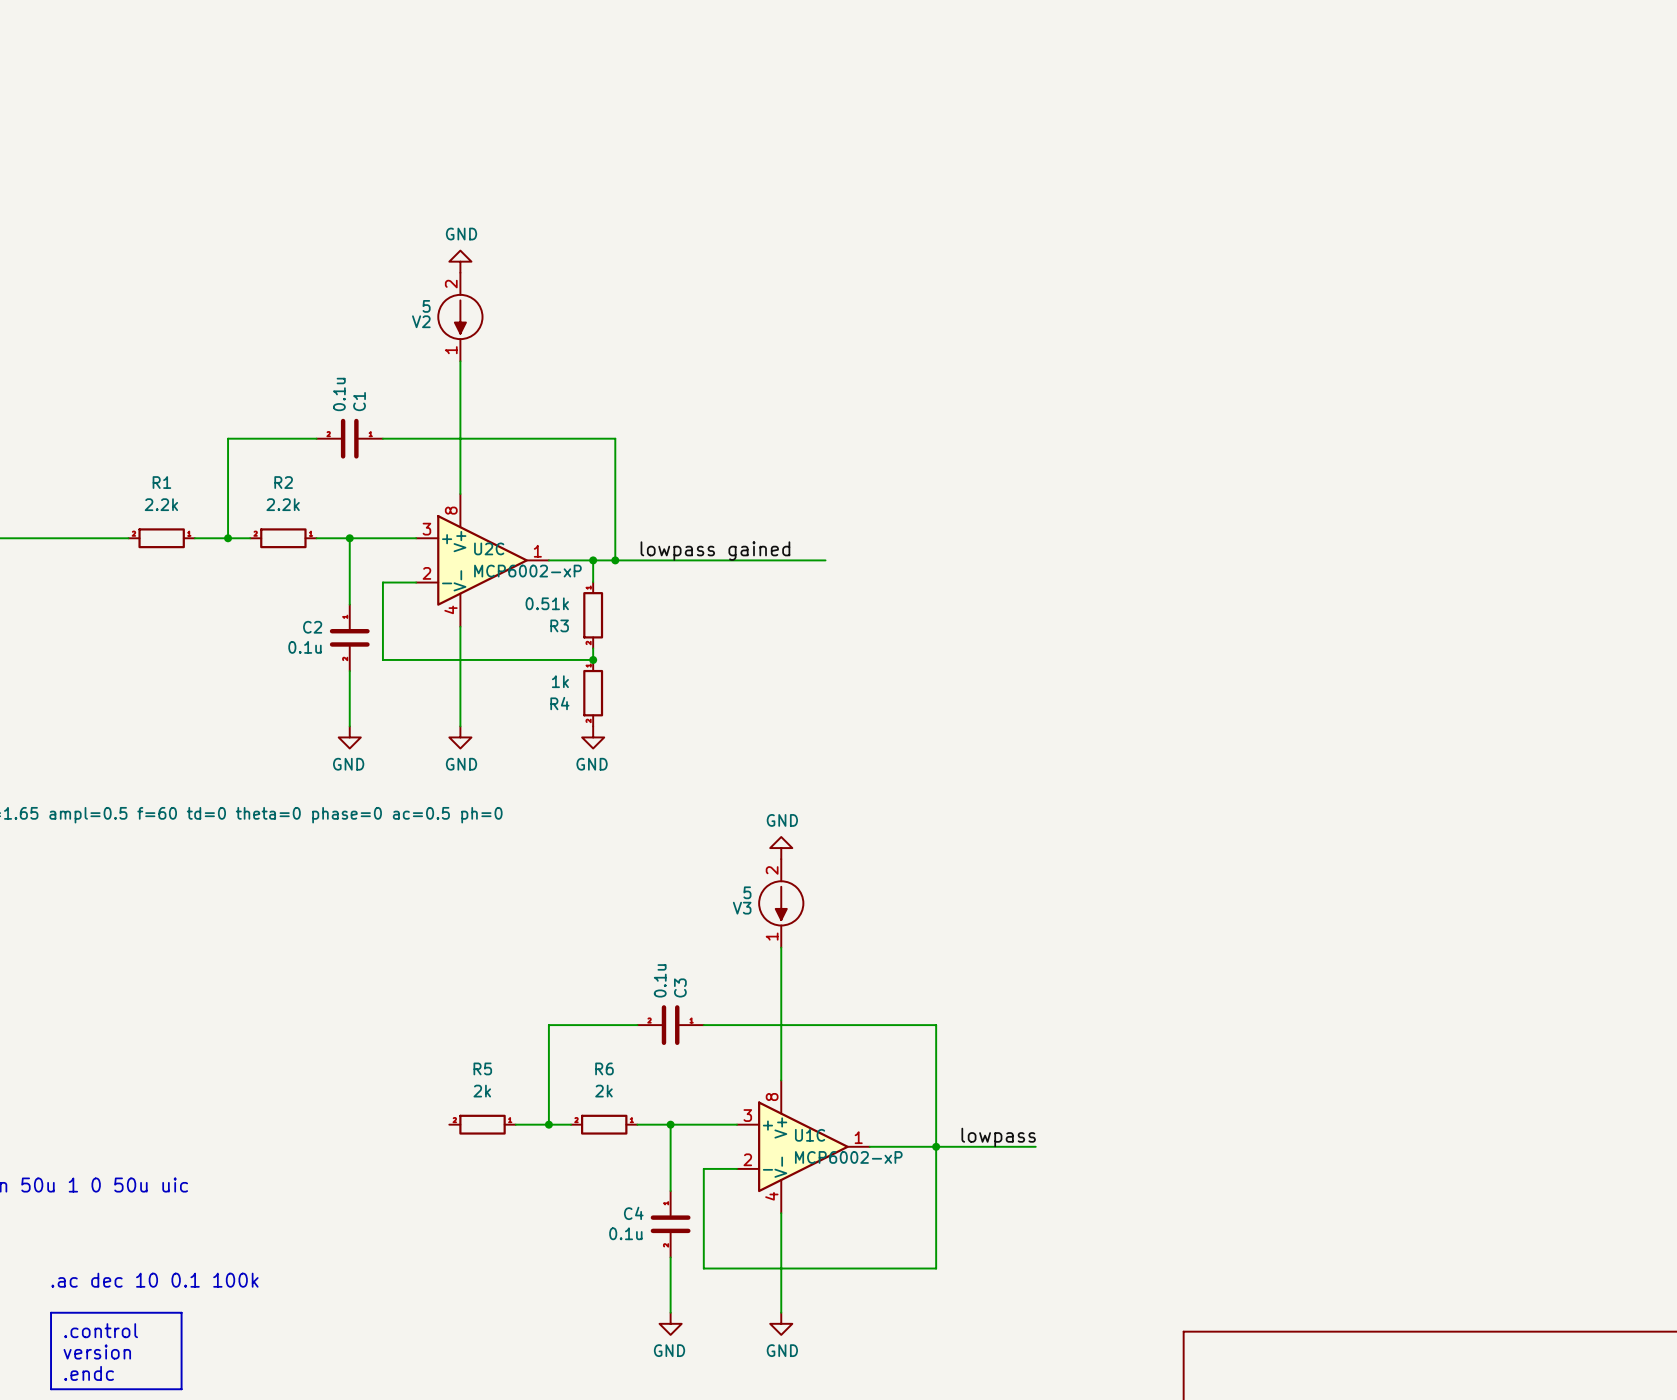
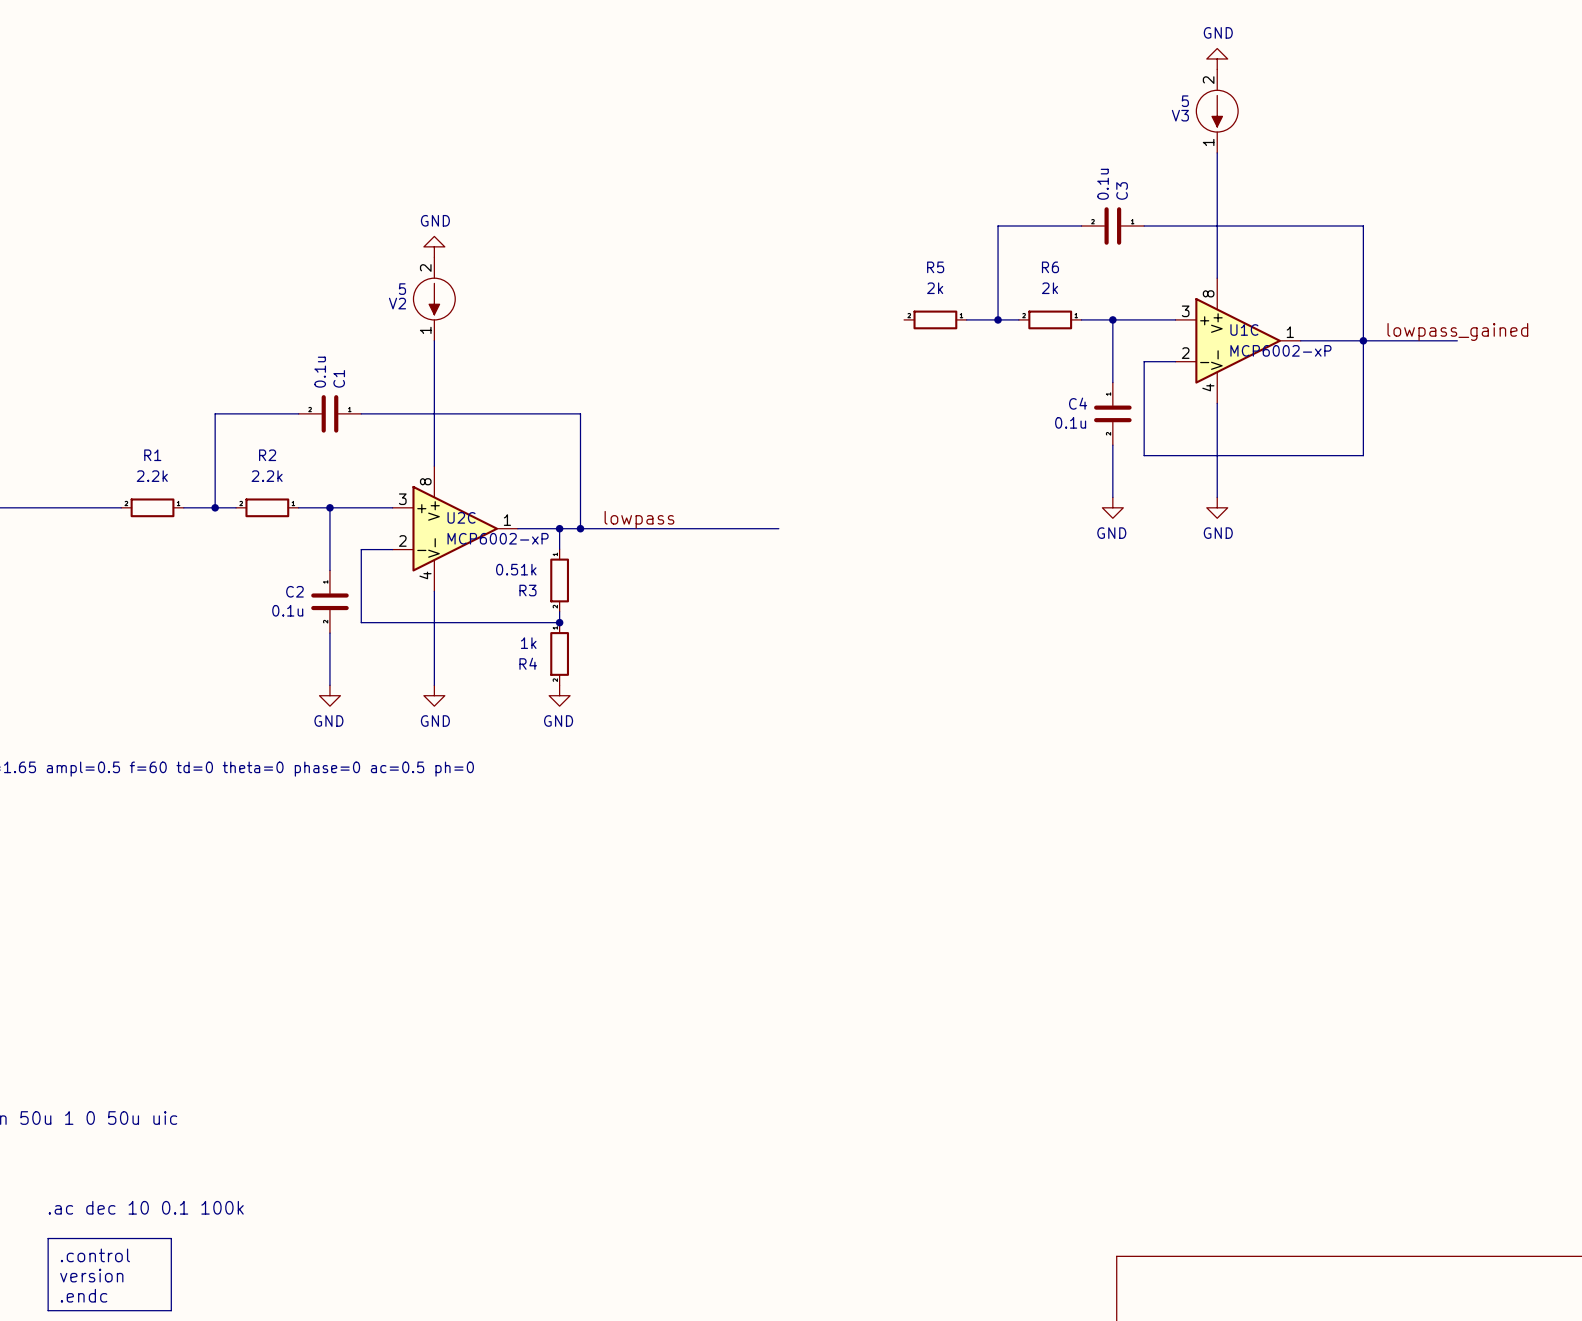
power symbol: none -> GND (1217, 58)
wire: none -> (1217, 152) (1217, 278)
wire: none -> (1081, 225) (998, 225) (998, 319)
wire: none -> (1144, 225) (1363, 225) (1363, 455) (1144, 455) (1144, 361) (1175, 361)
wire: none -> (966, 319) (1018, 319)
junction: none -> (998, 319)
wire: none -> (1081, 319) (1175, 319)
wire: none -> (1112, 319) (1112, 382)
junction: none -> (1112, 319)
label: none -> lowpass_gained (1457, 331)
part: none -> (1238, 340)
wire: none -> (1300, 340) (1457, 340)
junction: none -> (1363, 340)
wire: none -> (1217, 403) (1217, 497)
wire: none -> (1112, 445) (1112, 497)
power symbol: none -> GND (1112, 507)
power symbol: none -> GND (1217, 507)
label: lowpass gained (715, 551) -> lowpass (639, 519)
power symbol: GND (781, 848) -> none
V3 position: (781, 903) -> (1217, 111)
wire: (781, 947) (781, 1080) -> none
wire: (637, 1025) (548, 1025) (548, 1124) -> none
C3 position: (670, 1025) -> (1112, 225)
wire: (703, 1025) (936, 1025) (936, 1268) (703, 1268) (703, 1168) (737, 1168) -> none
R5 position: (482, 1124) -> (935, 319)
wire: (515, 1124) (571, 1124) -> none
junction: (548, 1124) -> none
R6 position: (604, 1124) -> (1050, 319)
wire: (637, 1124) (737, 1124) -> none
wire: (670, 1124) (670, 1191) -> none
junction: (670, 1124) -> none
label: lowpass (998, 1137) -> none
U1C position: (781, 1146) -> (1217, 340)
part: (803, 1146) -> none
wire: (869, 1146) (1035, 1146) -> none
junction: (936, 1146) -> none
wire: (781, 1213) (781, 1312) -> none
C4 position: (670, 1224) -> (1112, 413)
wire: (670, 1257) (670, 1312) -> none
power symbol: GND (670, 1323) -> none
power symbol: GND (781, 1323) -> none

